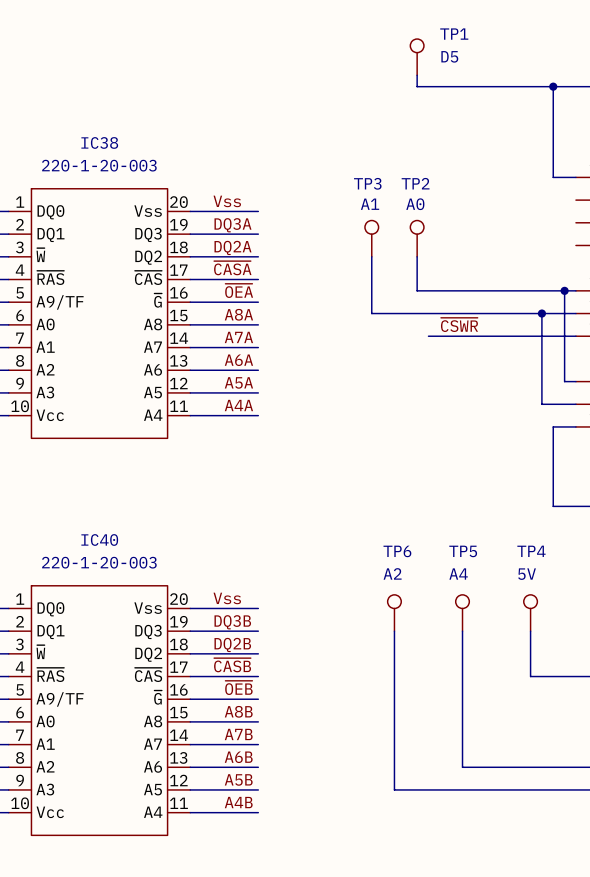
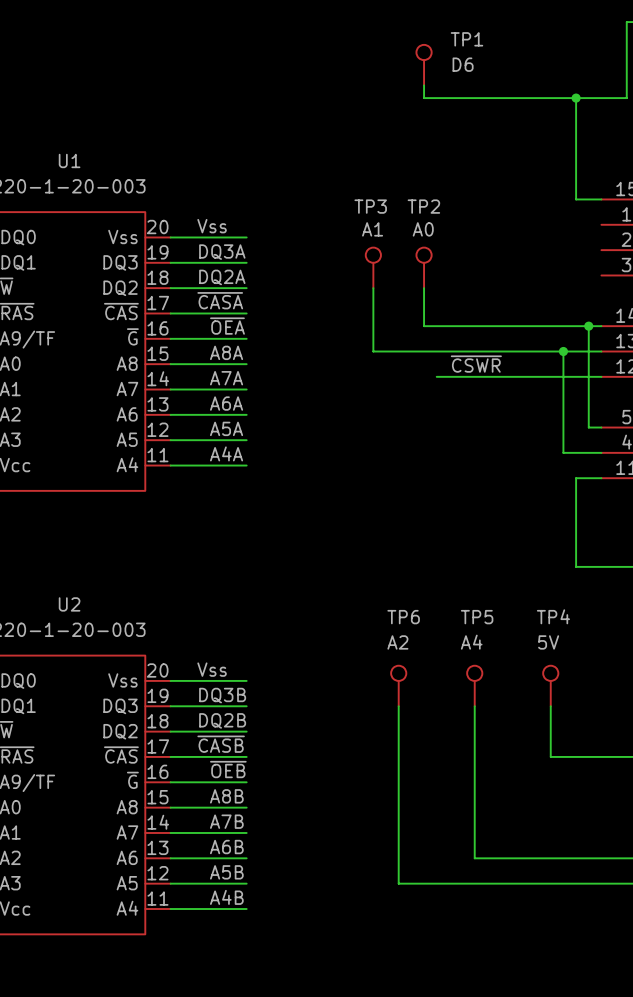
TP1 value: D5 (449, 56) -> D6 (463, 64)
IC38 name: IC38 (99, 142) -> U1 (69, 160)
IC40 name: IC40 (99, 539) -> U2 (69, 604)

